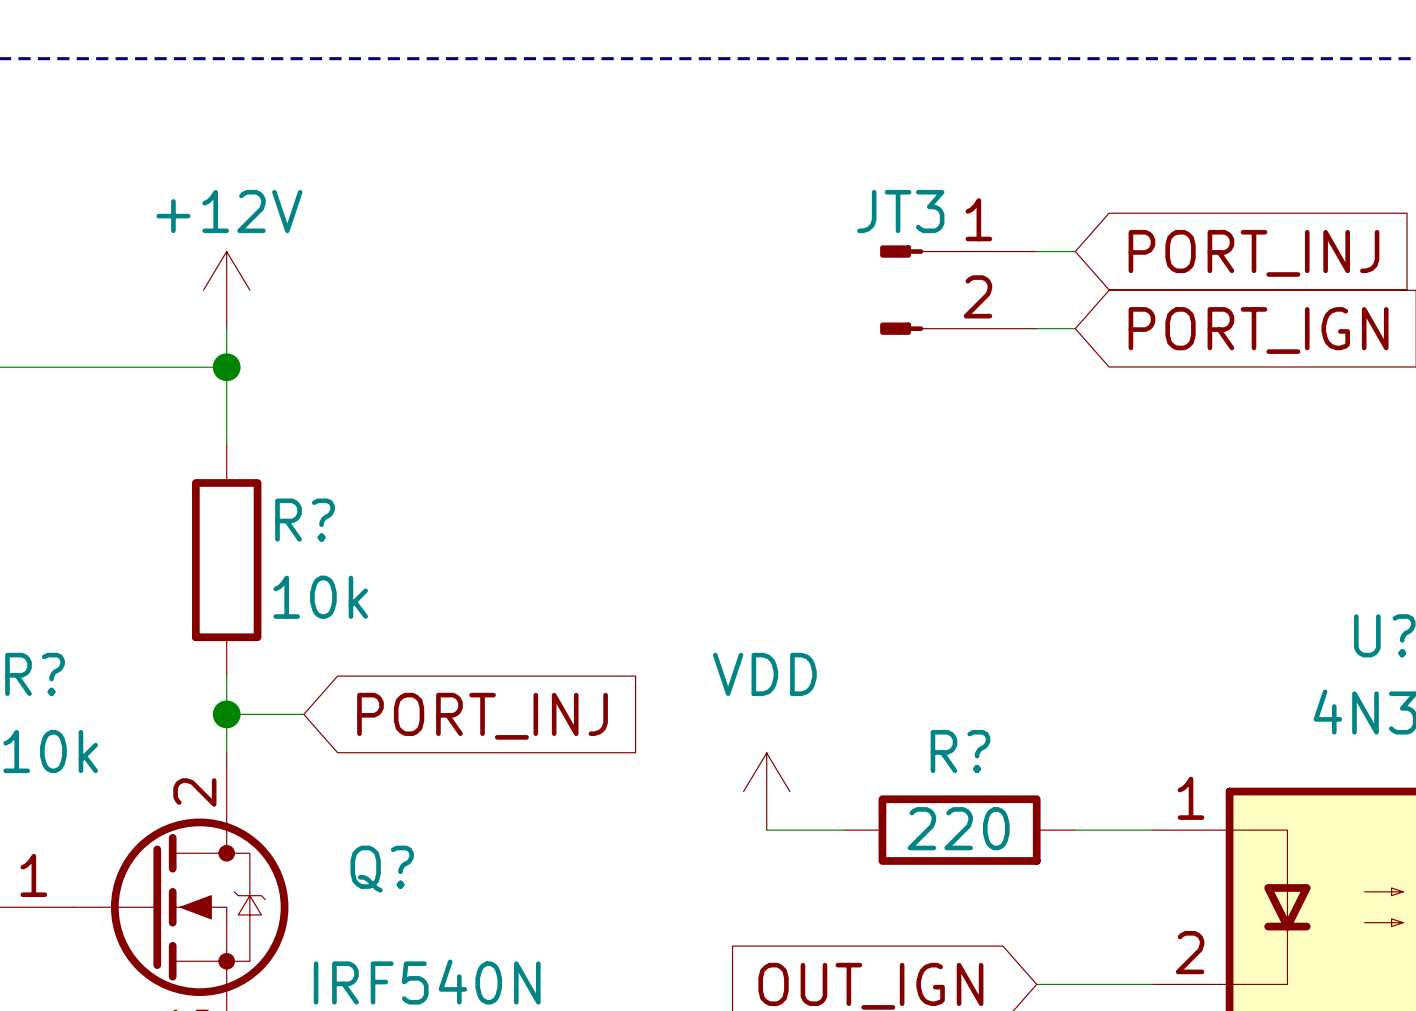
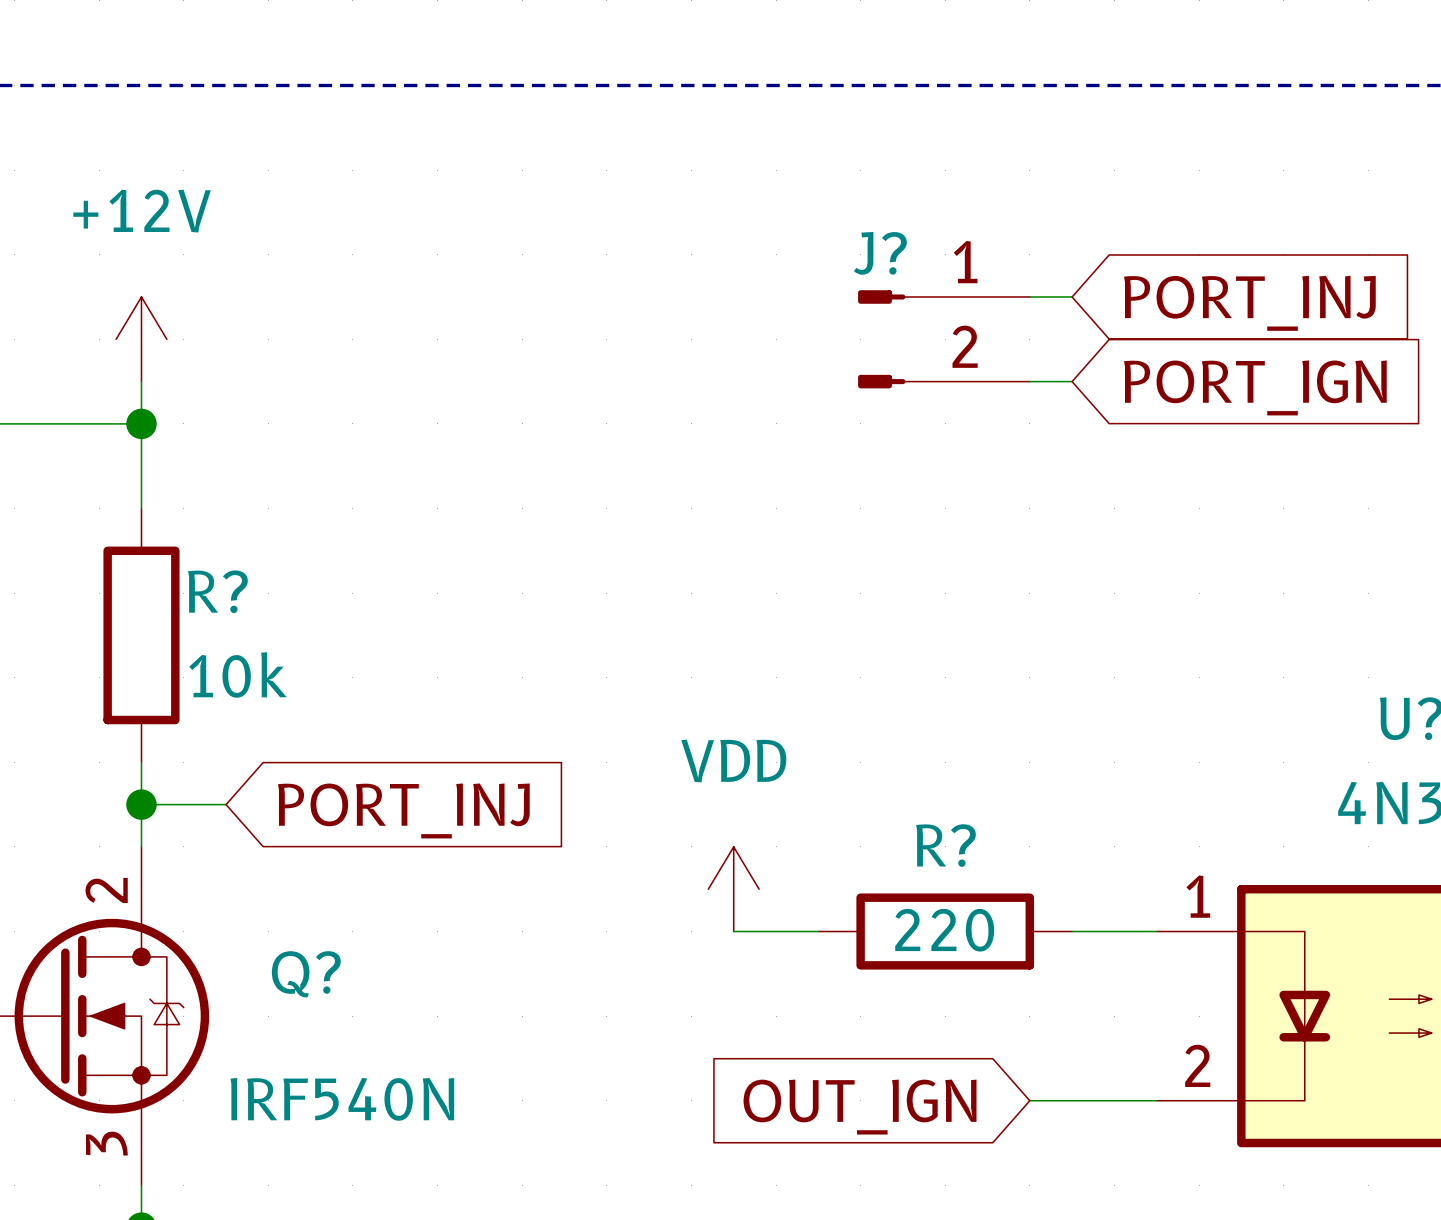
power symbol text position: +12V (229, 211) -> +12V (142, 211)
JT3 name: JT3 (900, 211) -> J? (880, 253)

